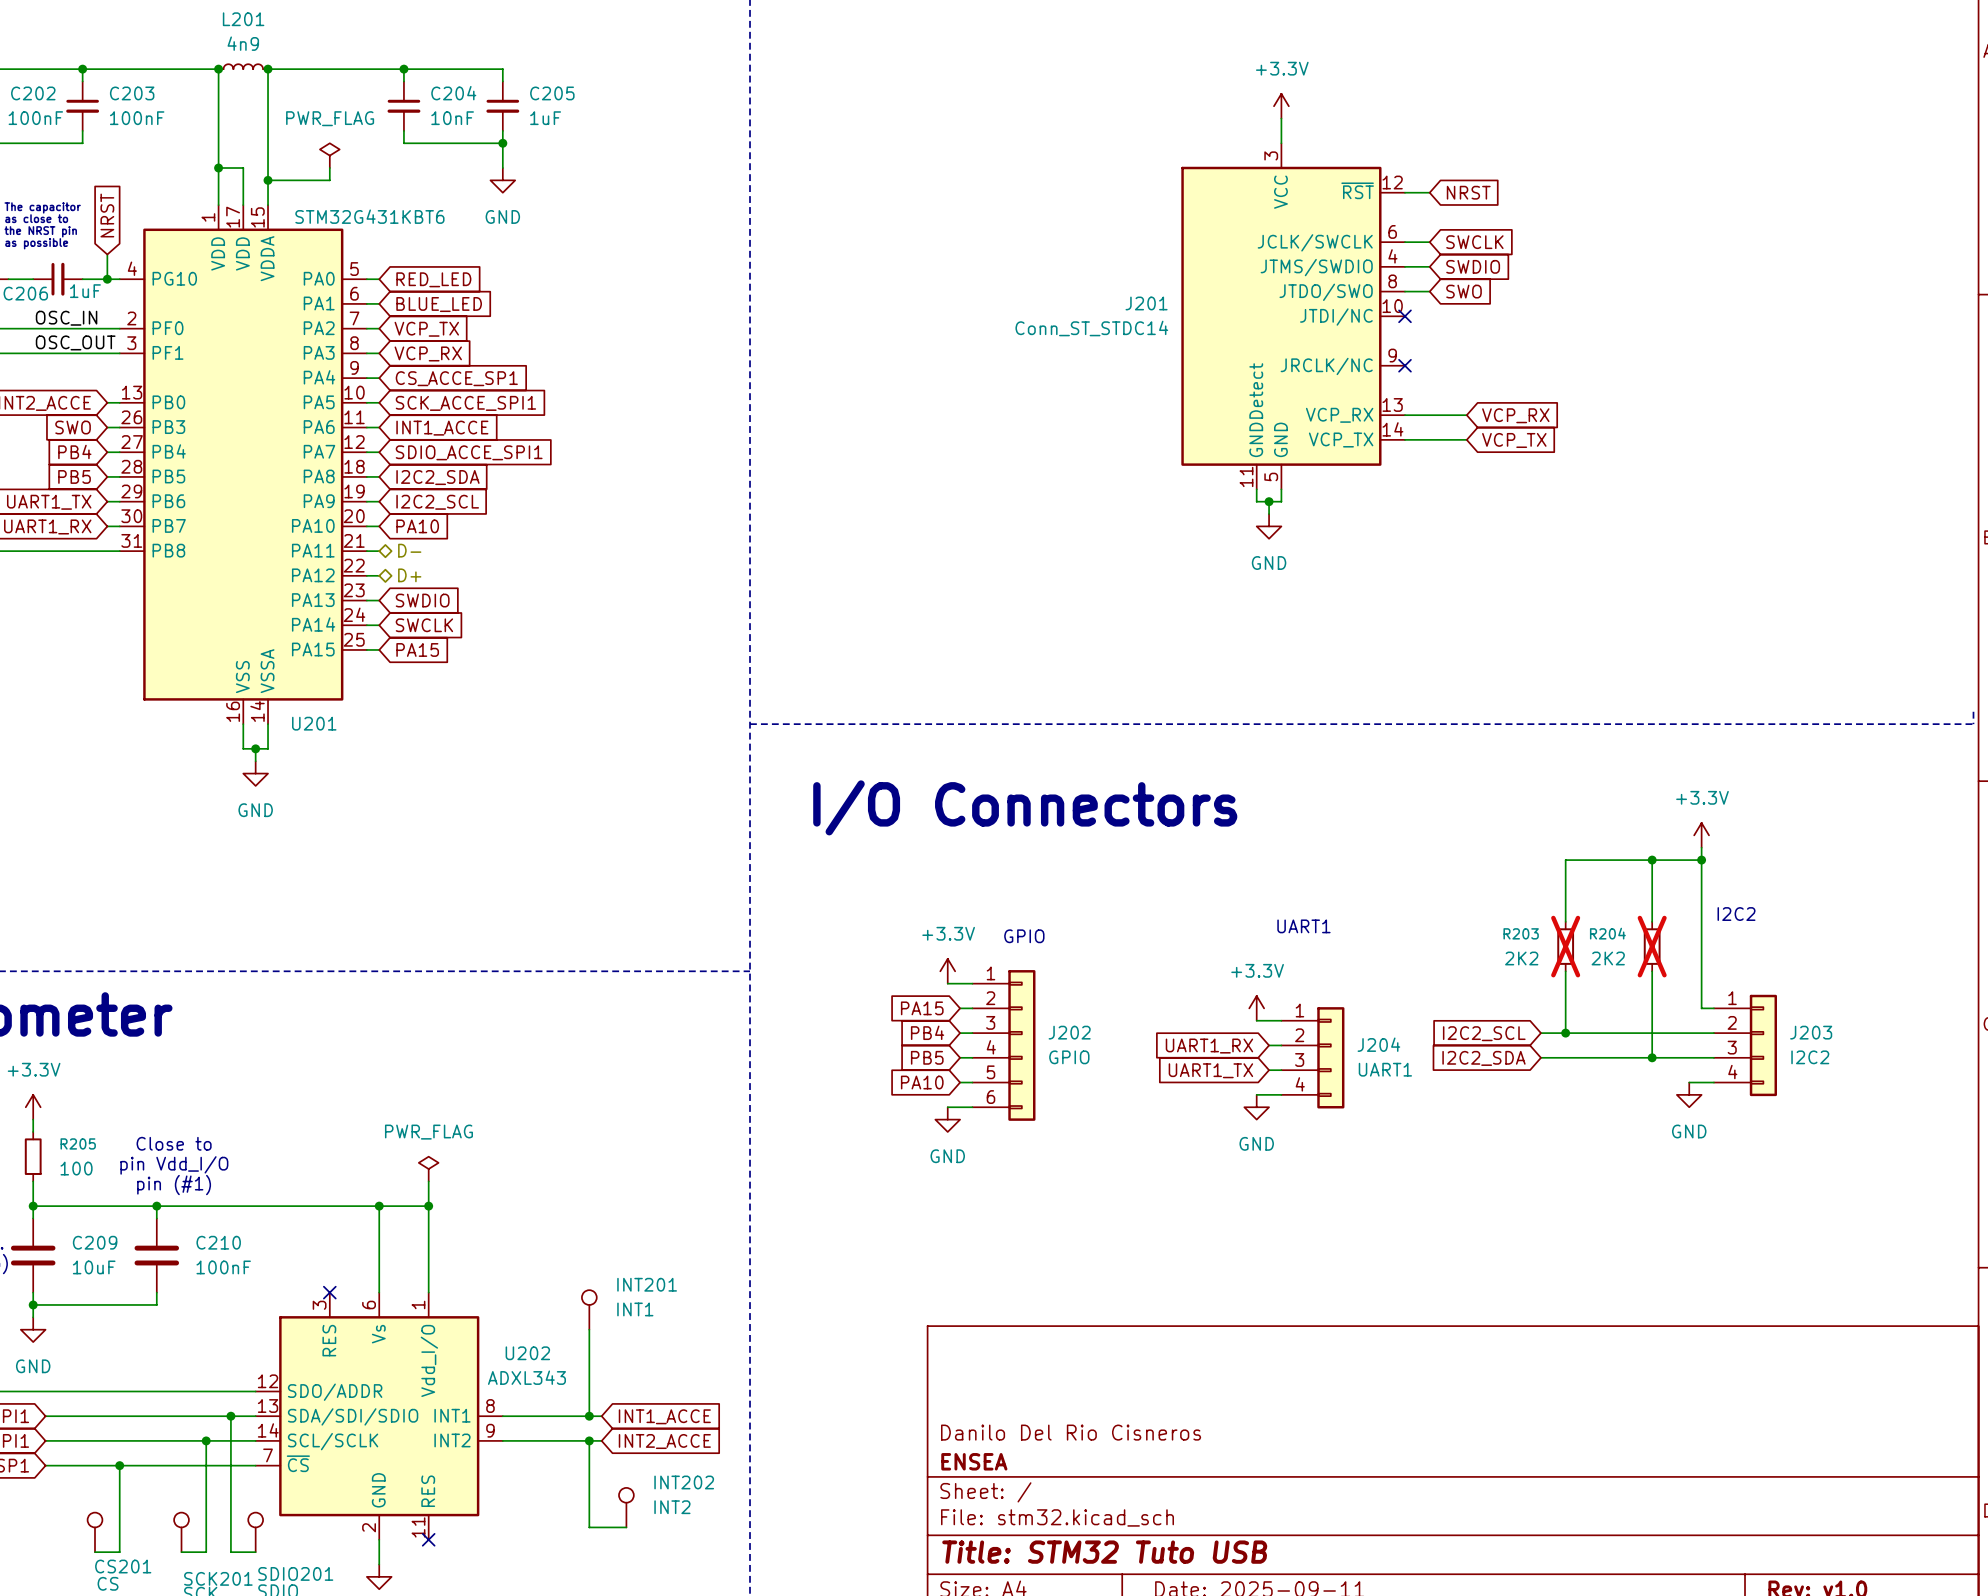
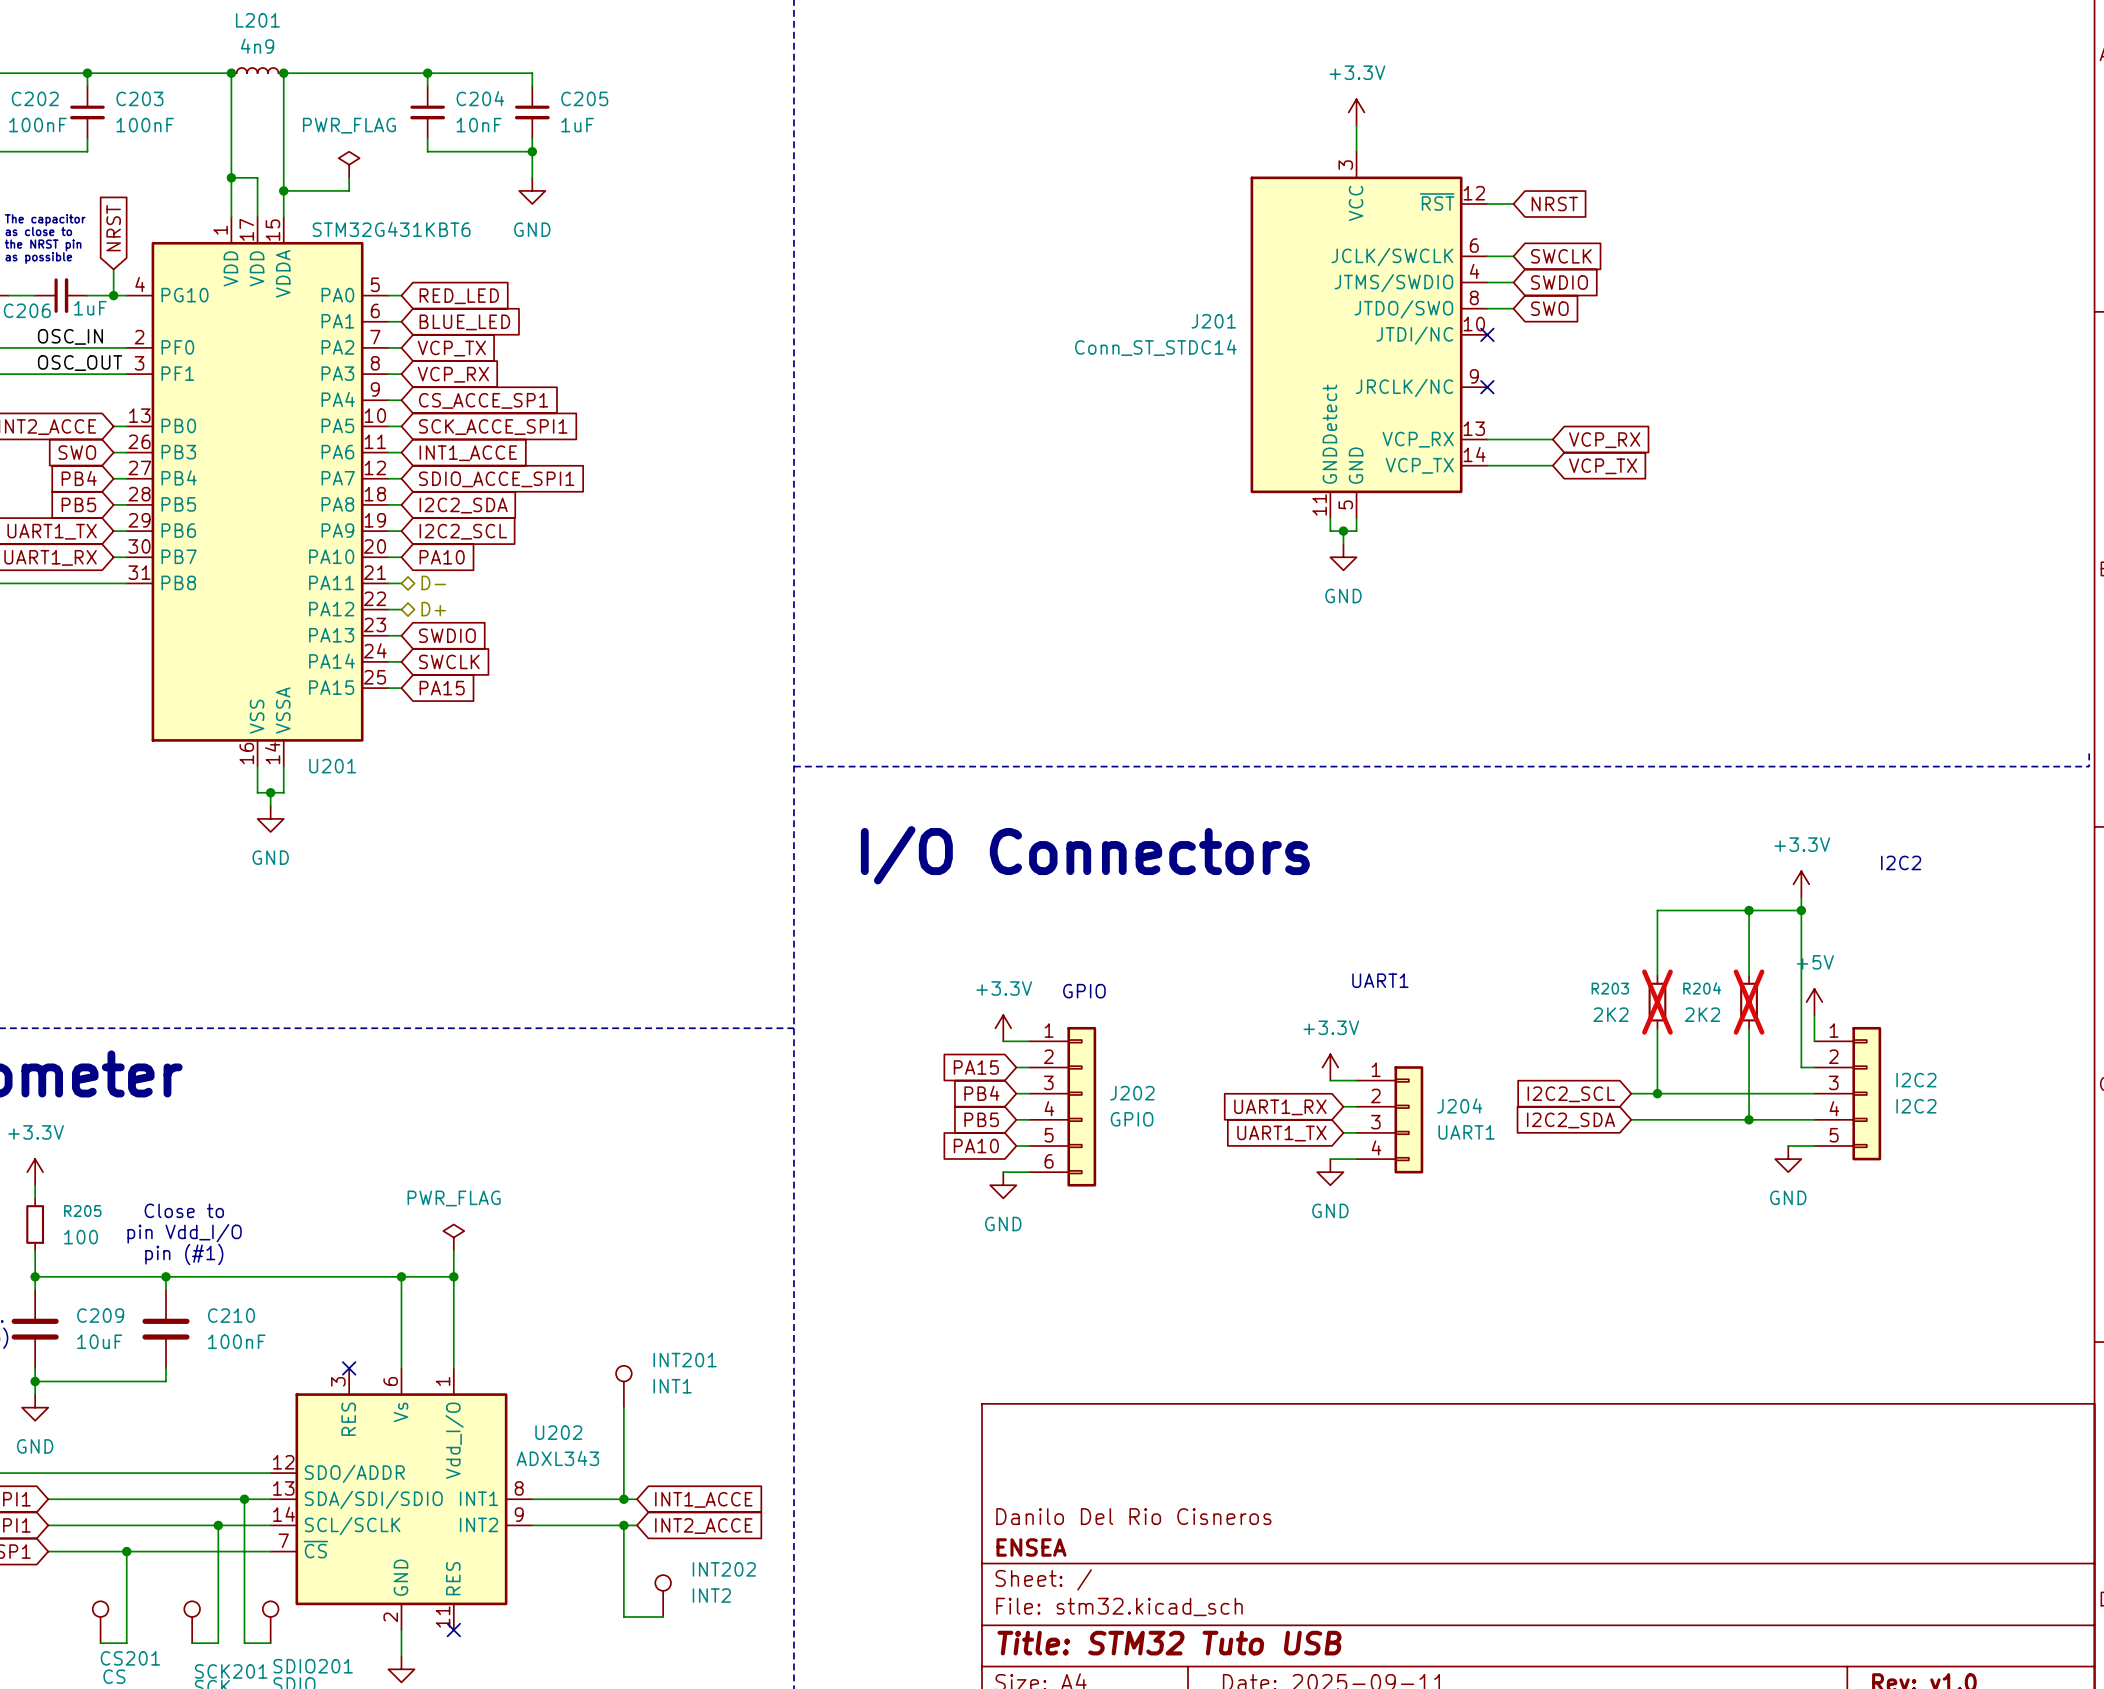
text position: I2C2 (1736, 914) -> I2C2 (1901, 862)
power symbol: none -> +5V (1814, 1002)
wire: none -> (1814, 1015) (1814, 1041)
I2C2: none -> I2C2 (1847, 1093)
J203: I2C2 (1745, 1045) -> none

